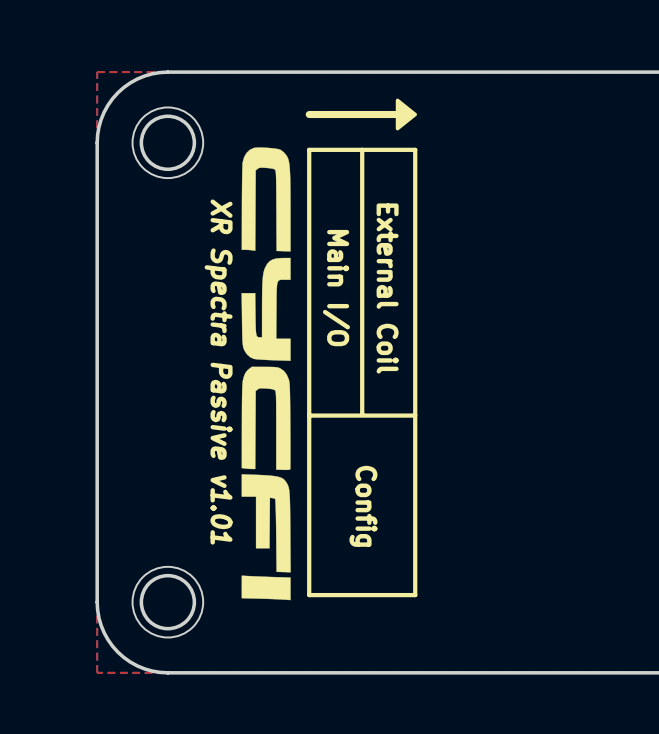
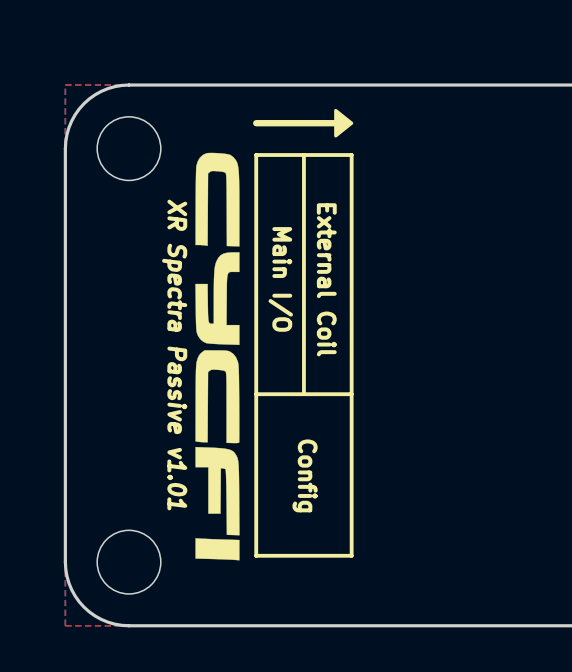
round board edge: [139, 114, 197, 172] -> none
round board edge: [139, 573, 197, 631] -> none

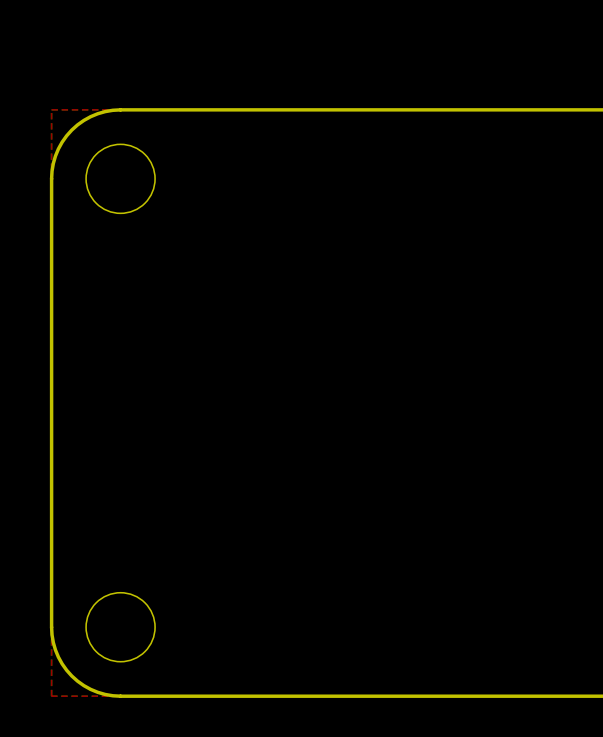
drawing: [334, 108, 354, 138] -> none
line: (256, 123) (342, 123) -> none
drawing: [195, 152, 240, 561] -> none
line: (256, 155) (256, 555) (351, 555) (351, 155) (256, 155) -> none
line: (303, 155) (303, 393) -> none
text: Main I/O (280, 279) -> none
text: External Coil (326, 279) -> none
text: XR Spectra Passive v1.01 (174, 355) -> none
line: (256, 394) (351, 394) -> none
text: Config (305, 475) -> none

